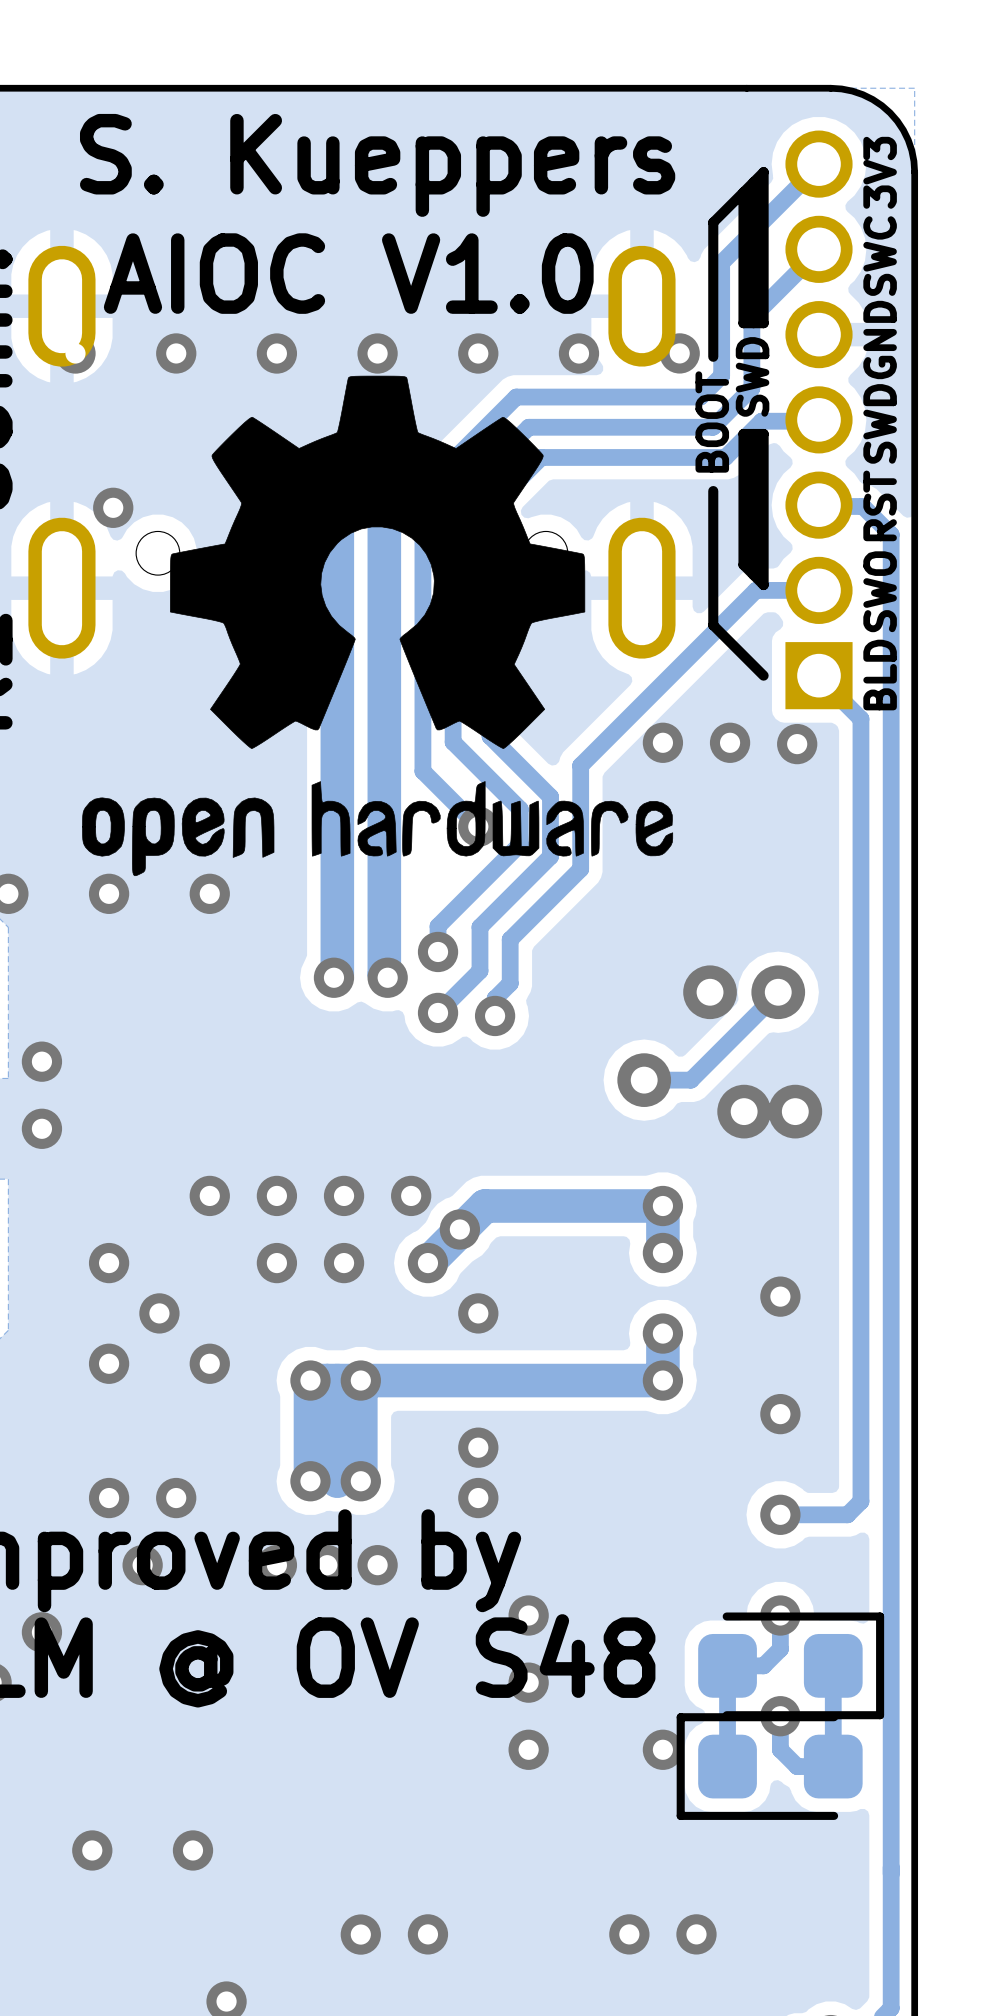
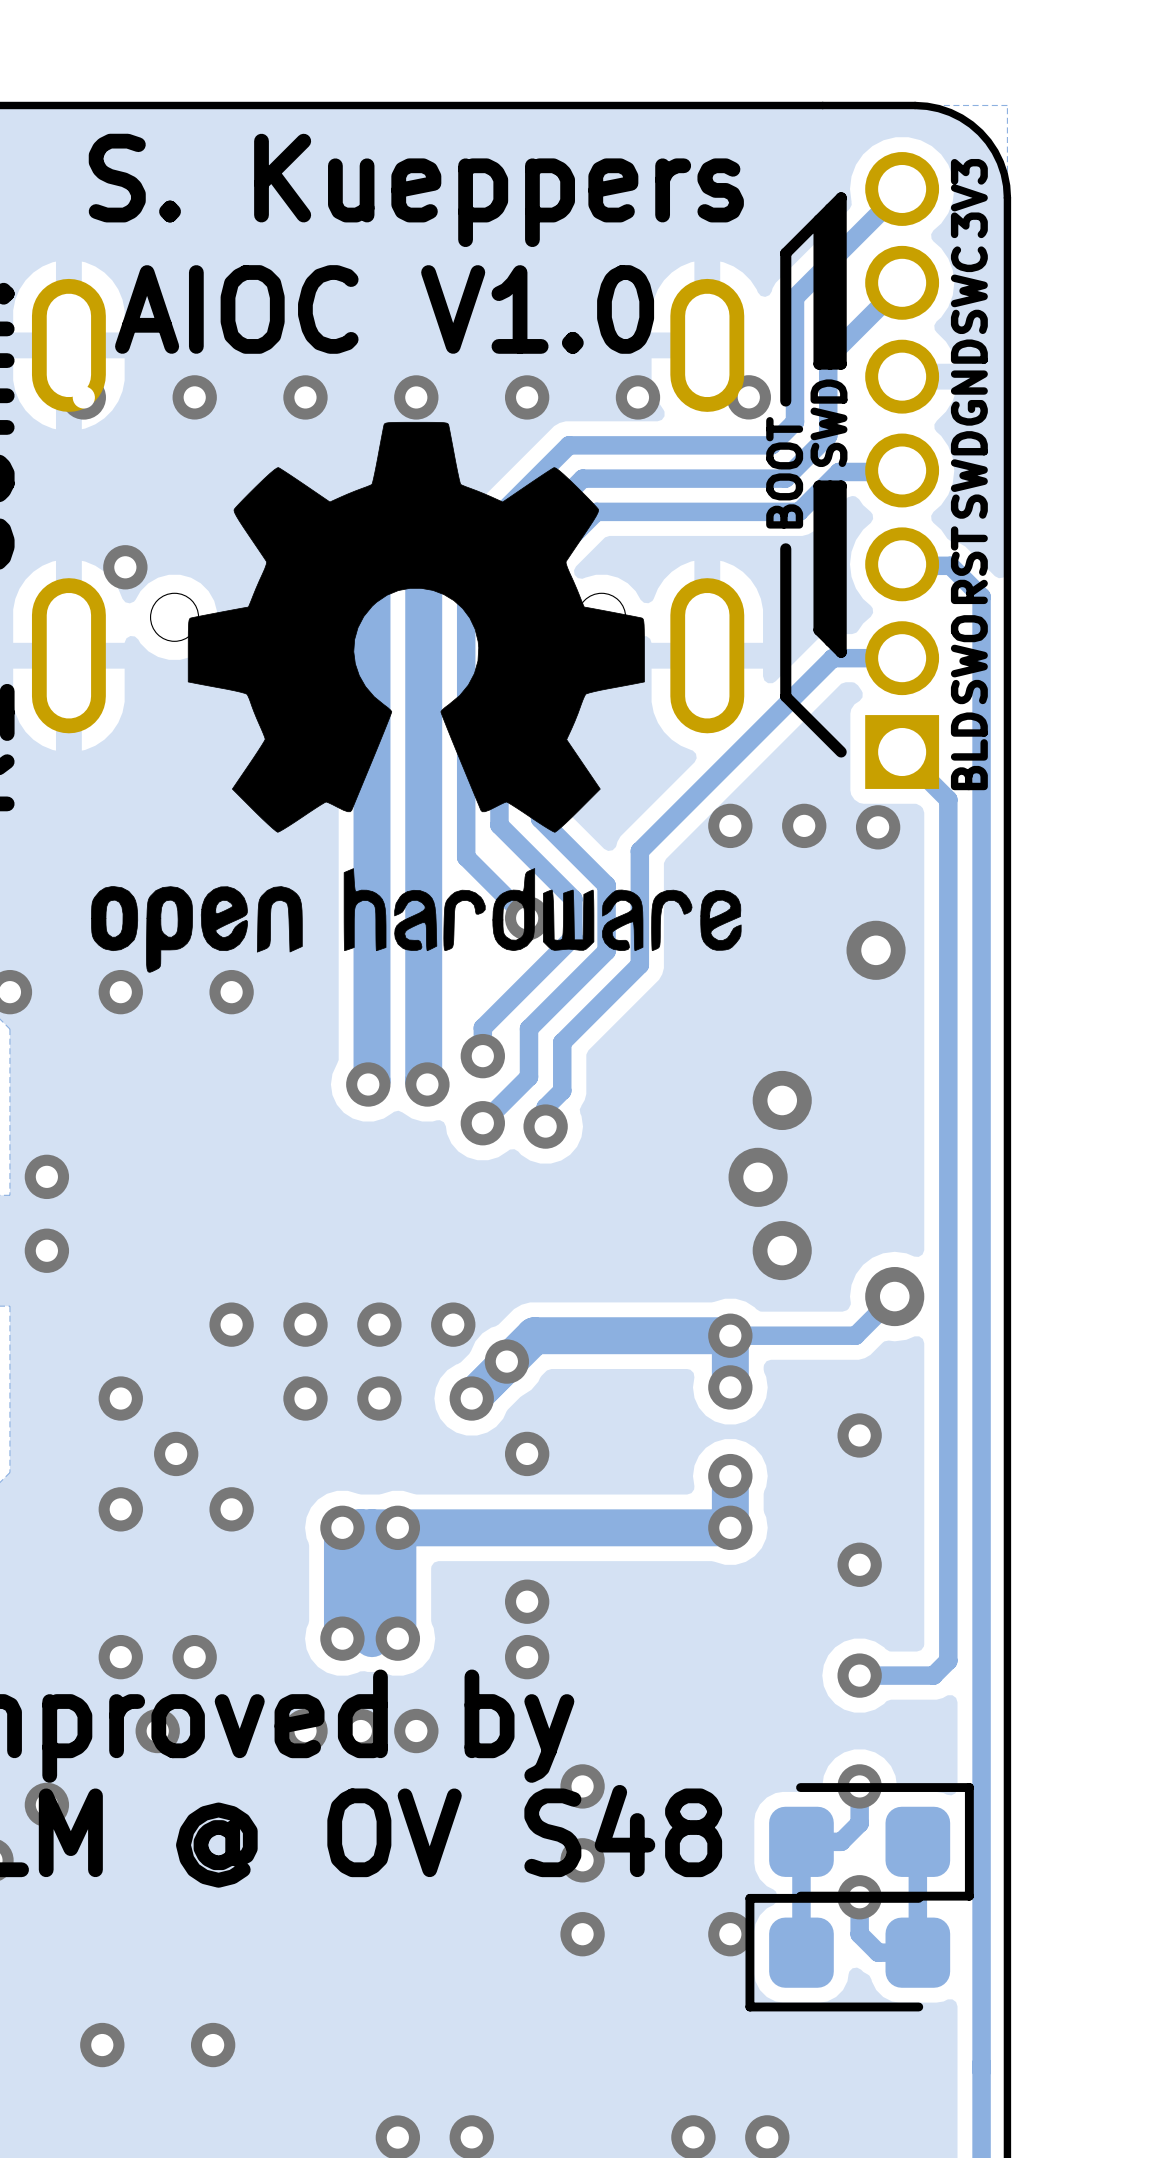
via: none -> (876, 950)
track: (778, 992) (691, 1080) (644, 1080) -> none
via: (778, 992) -> none
via position: (644, 1080) -> (758, 1177)
via position: (744, 1111) -> (782, 1250)
via: (795, 1111) -> none
track: none -> (894, 1296) (855, 1335) (730, 1335)
via: none -> (894, 1296)

